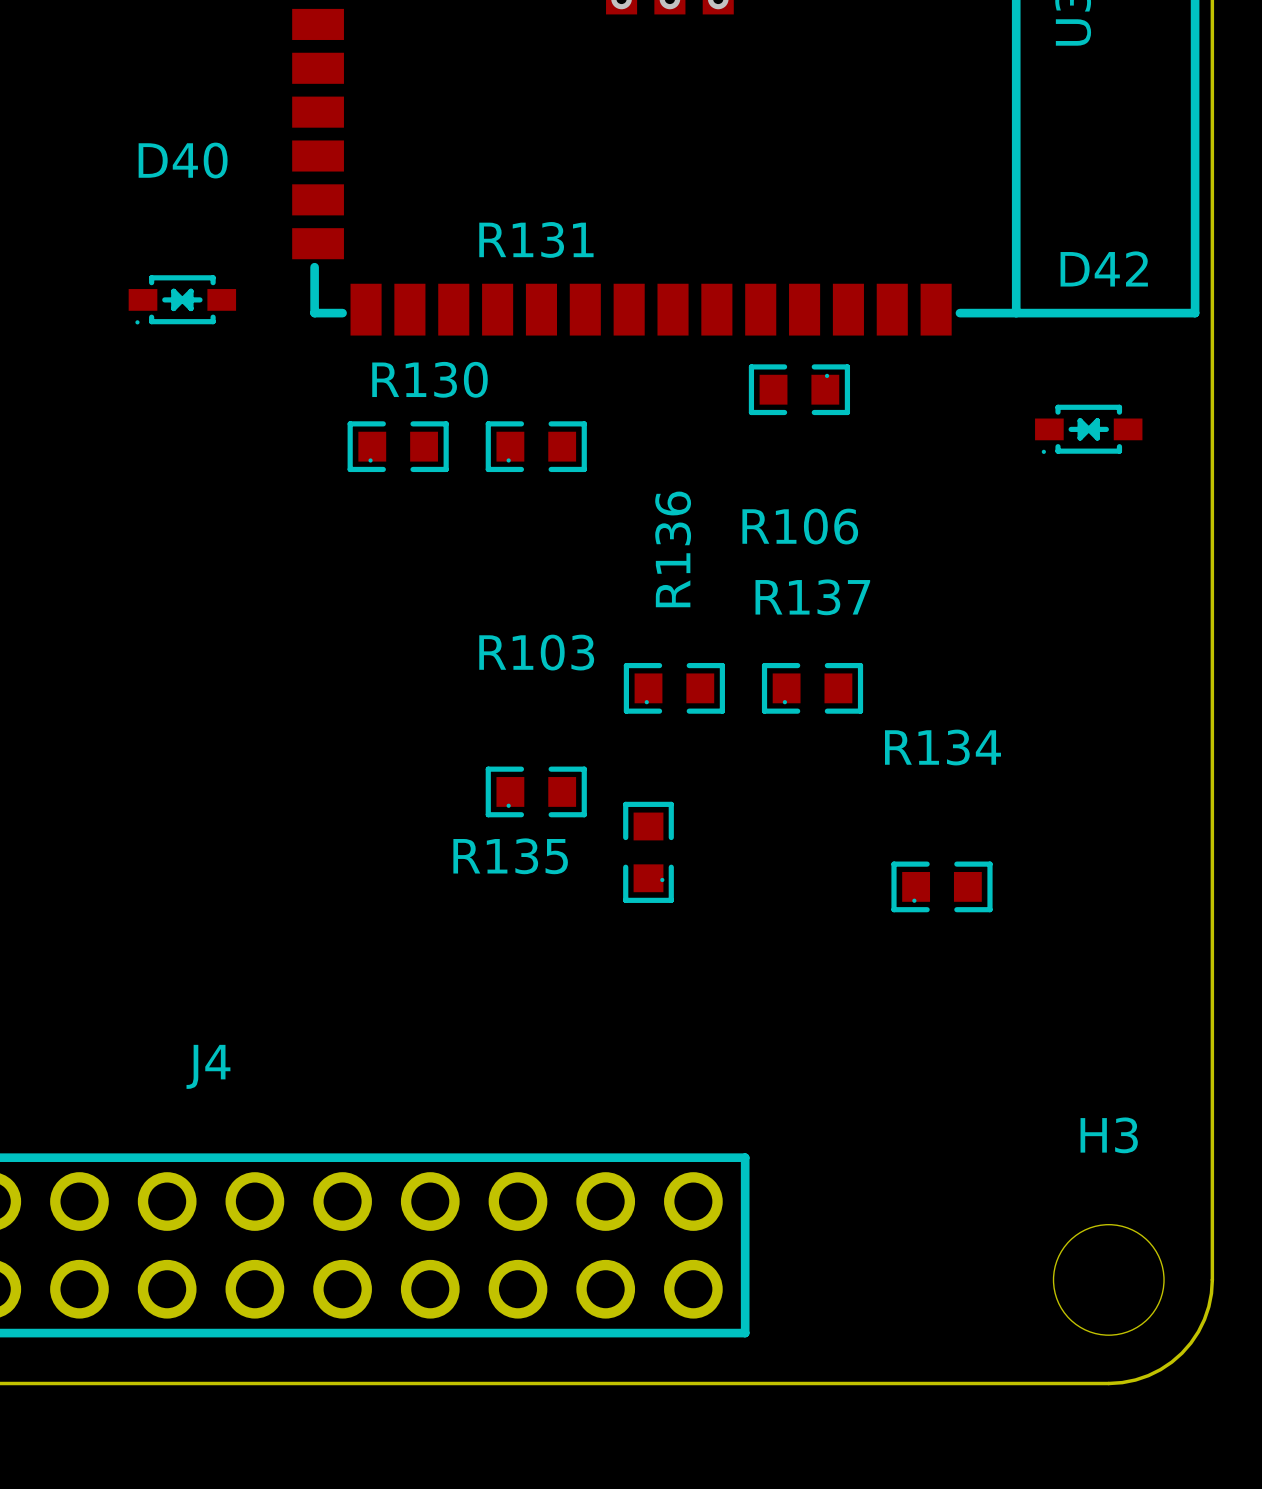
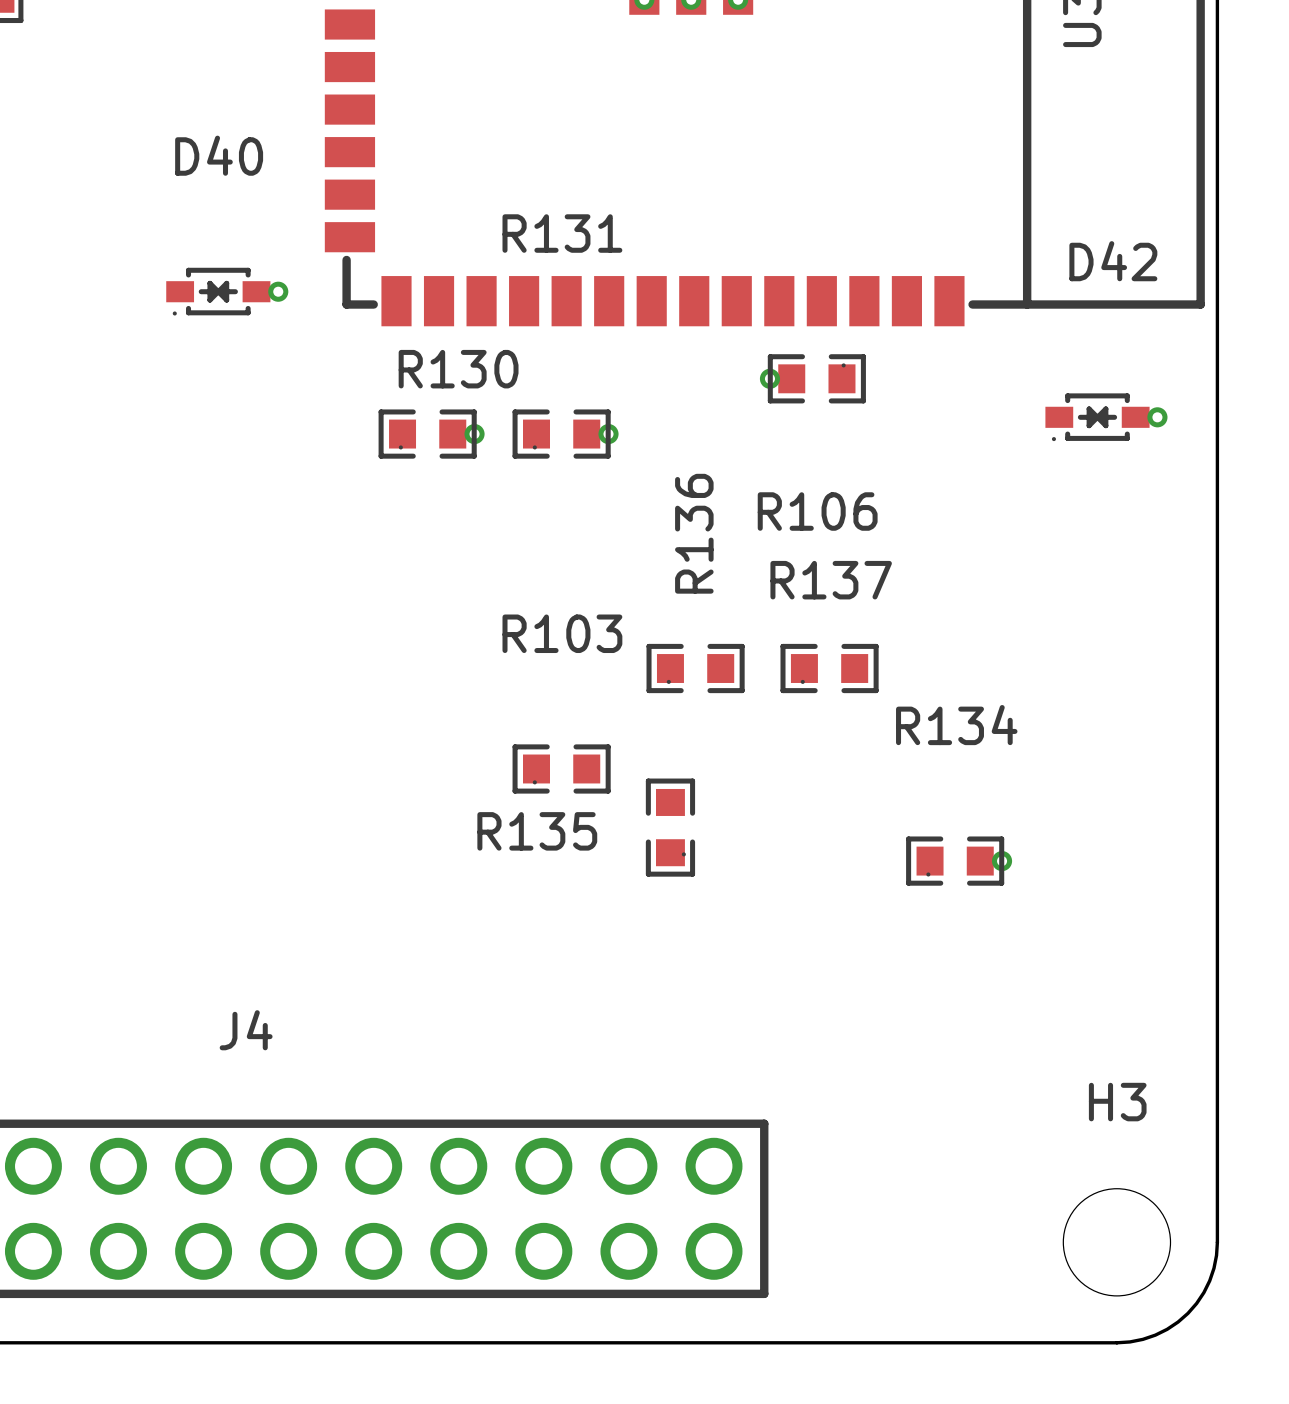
via: none -> (278, 291)
via: none -> (769, 378)
via: none -> (1157, 417)
via: none -> (474, 434)
via: none -> (608, 434)
via: none -> (1002, 861)

